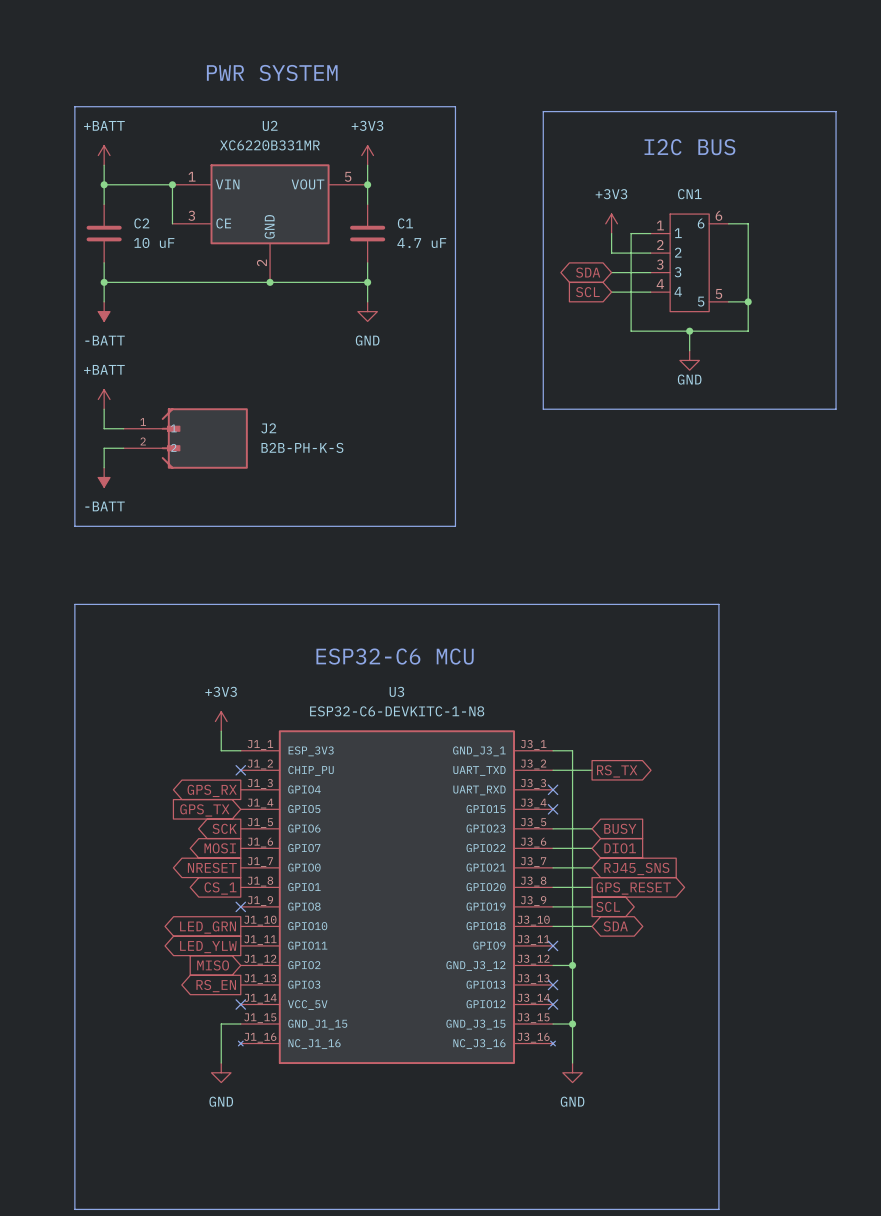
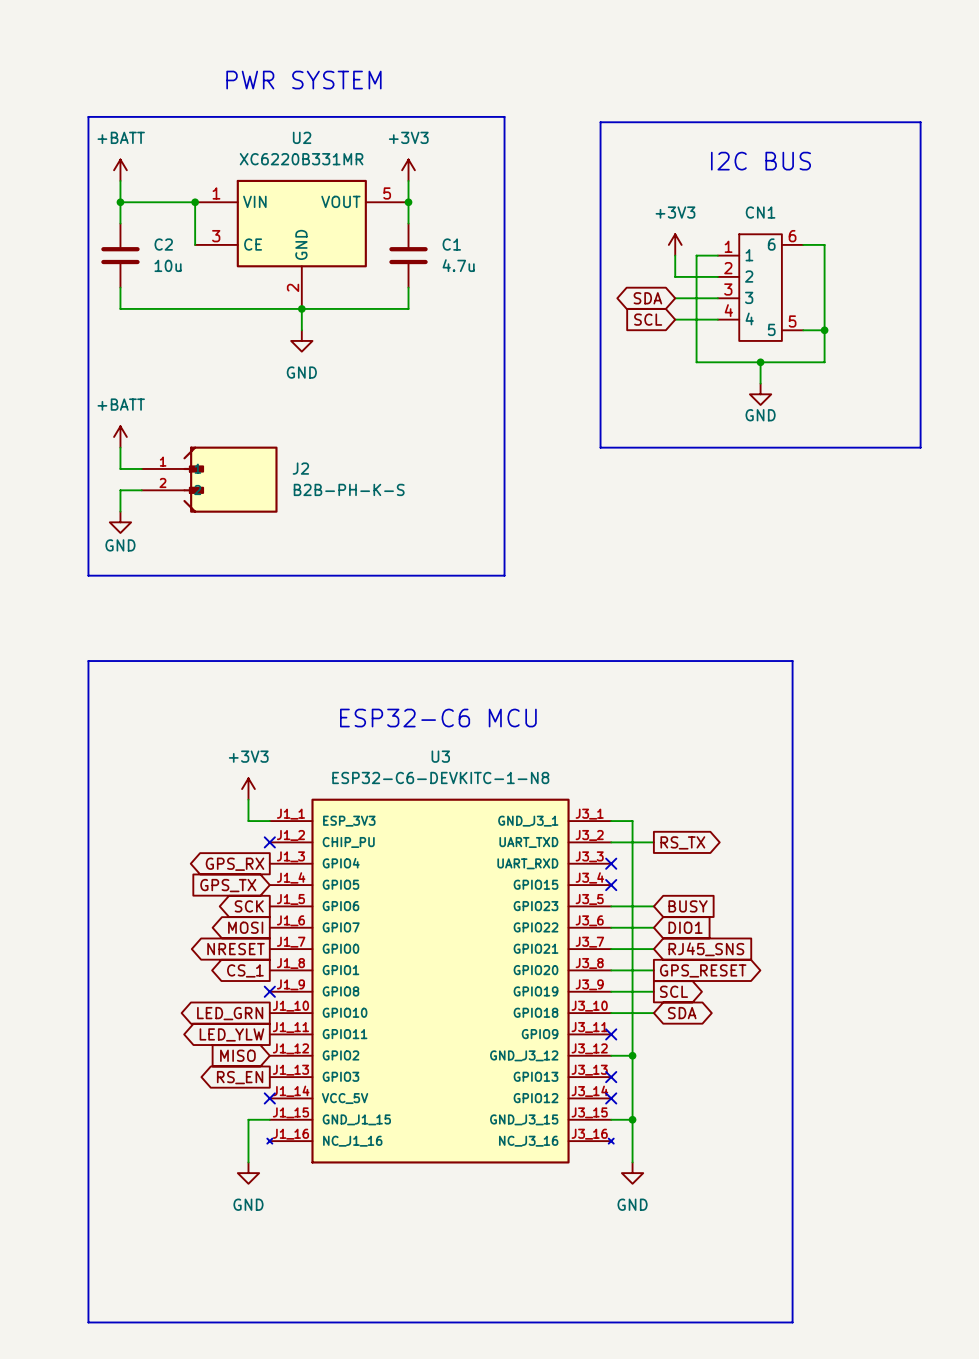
C2 value: 10 uF (154, 242) -> 10u (168, 265)
C1 value: 4.7 uF (421, 243) -> 4.7u (458, 265)
wire: (104, 282) (104, 301) -> none
junction: (104, 282) -> none
wire: (367, 282) (367, 301) -> (301, 308) (301, 330)
junction: (367, 282) -> none
power symbol: -BATT (104, 311) -> none
power symbol position: GND (367, 311) -> GND (301, 340)
power symbol: -BATT (104, 477) -> GND (120, 522)

